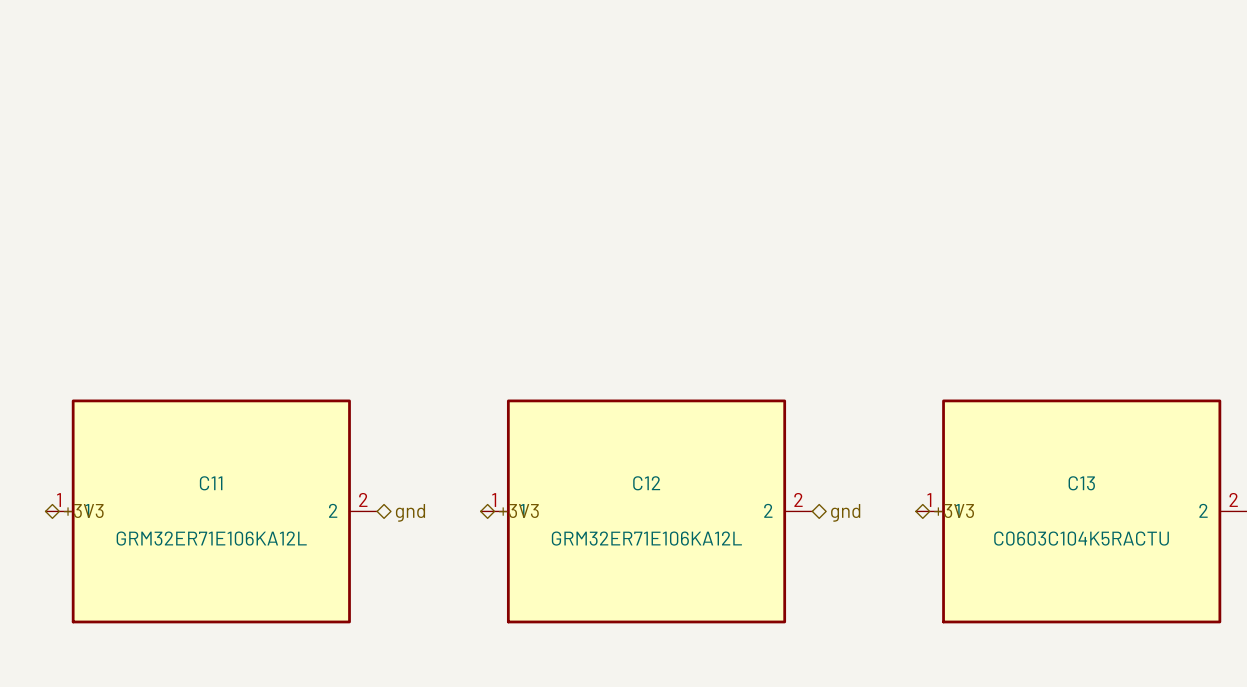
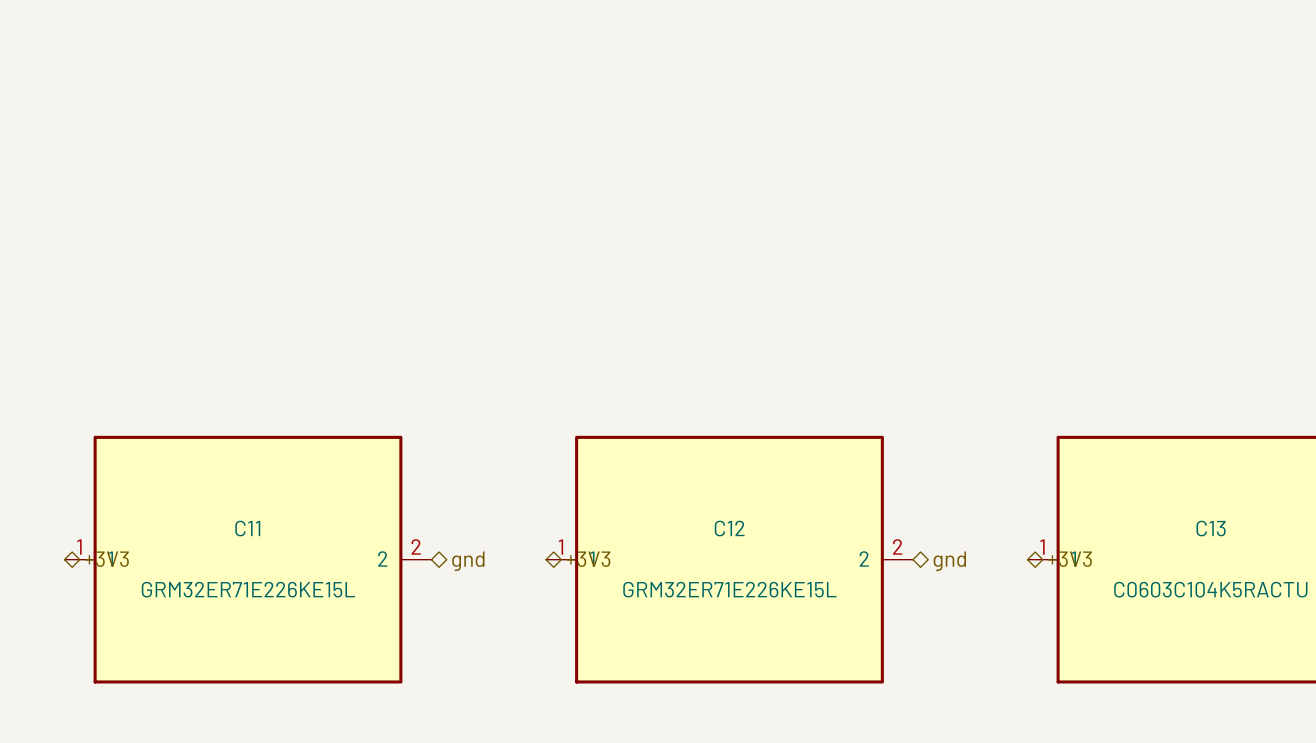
C11 value: GRM32ER71E106KA12L (211, 538) -> GRM32ER71E226KE15L (248, 589)
C12 value: GRM32ER71E106KA12L (646, 538) -> GRM32ER71E226KE15L (729, 589)

